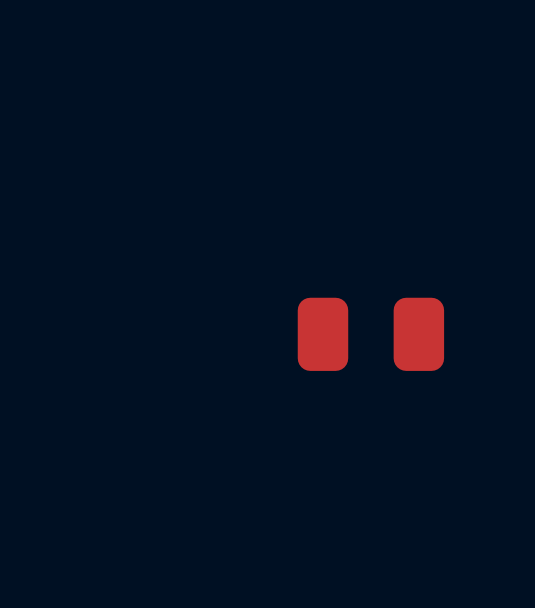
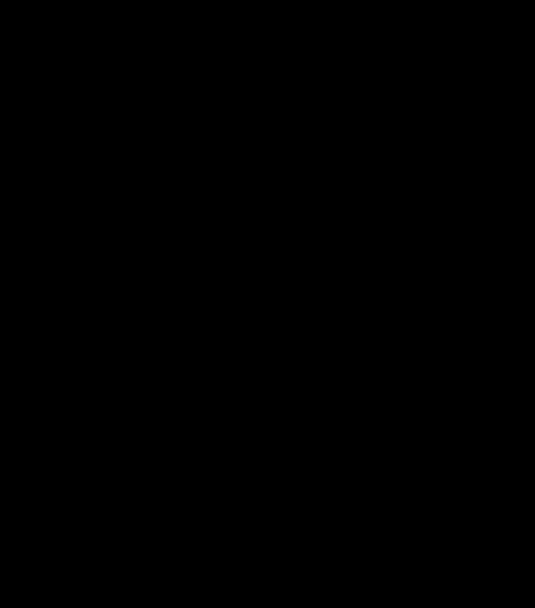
part: (370, 334) -> none

